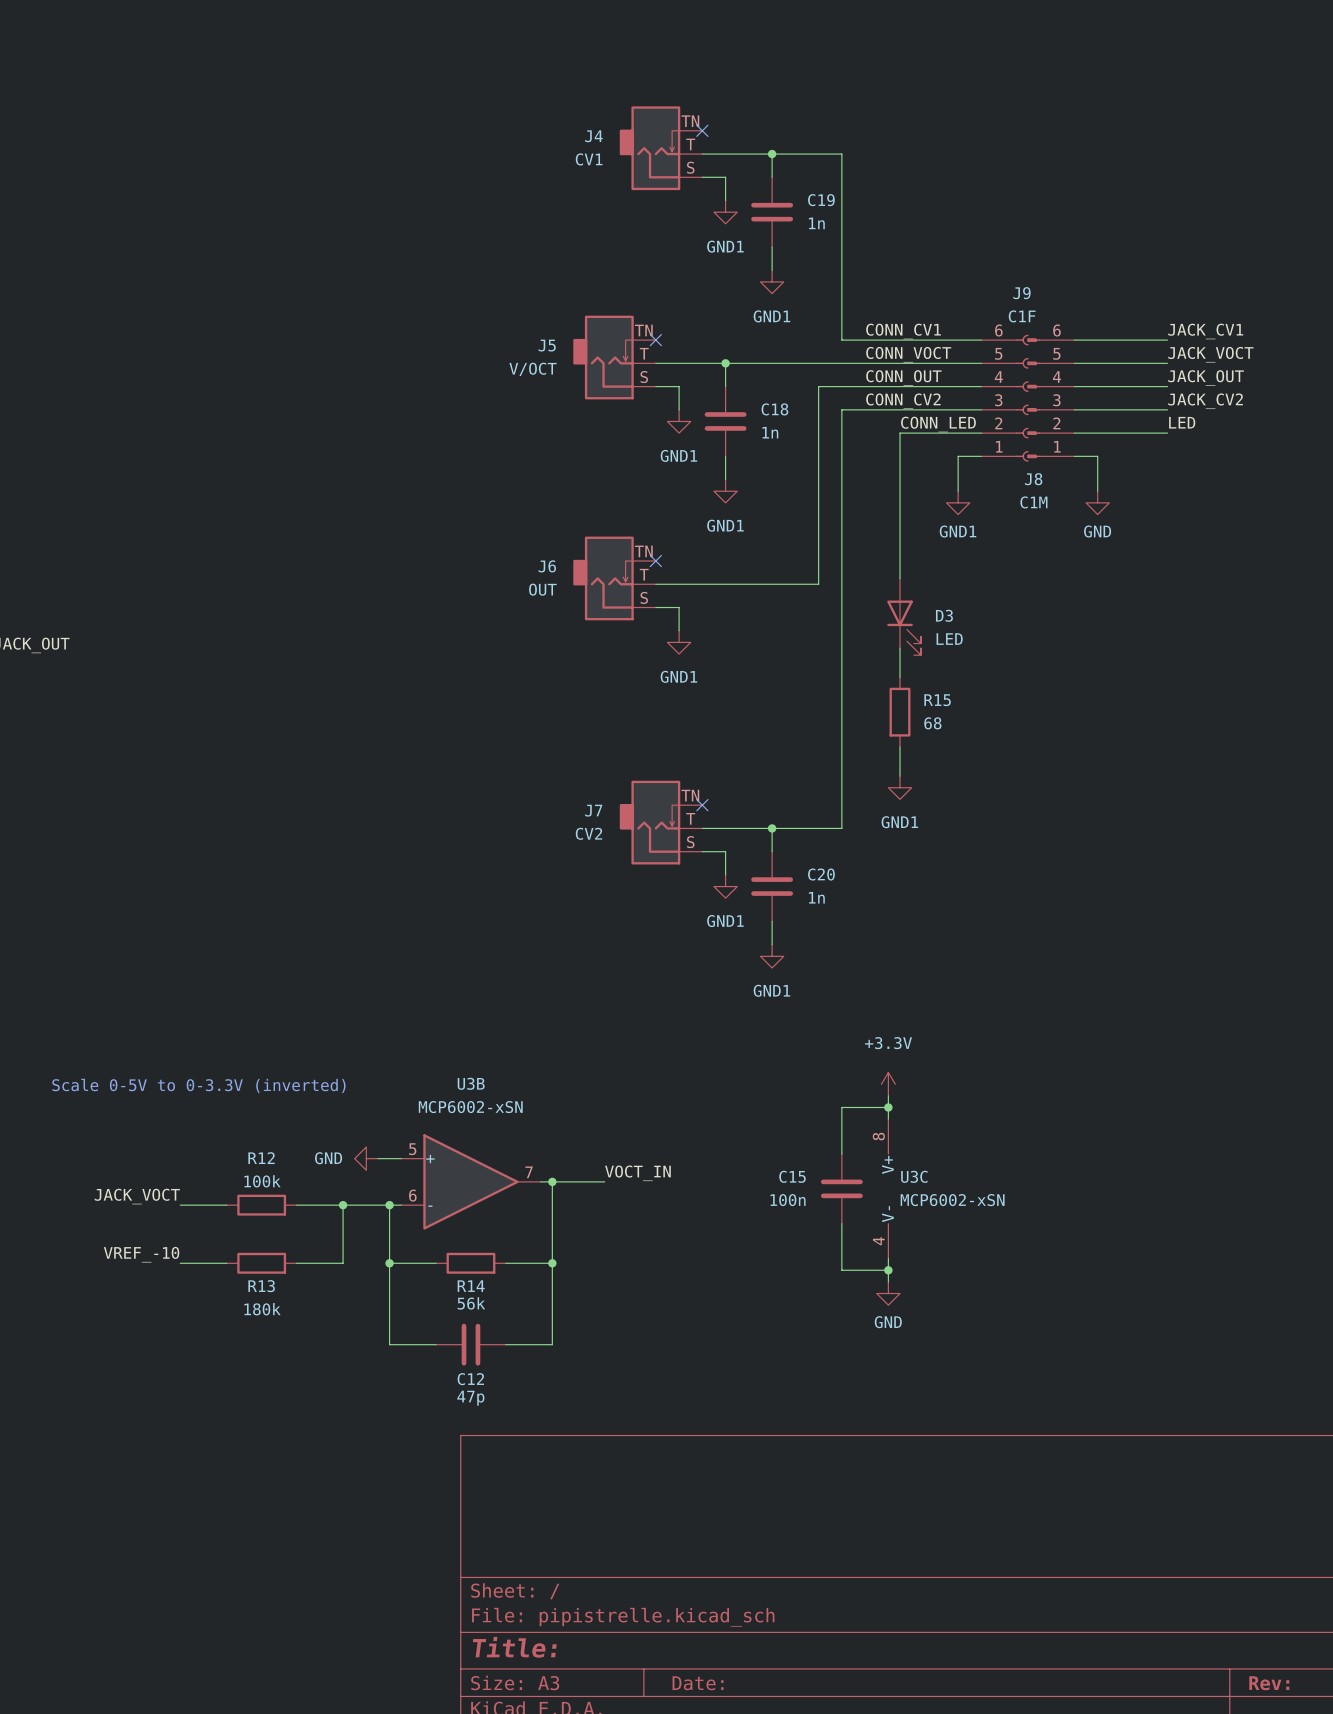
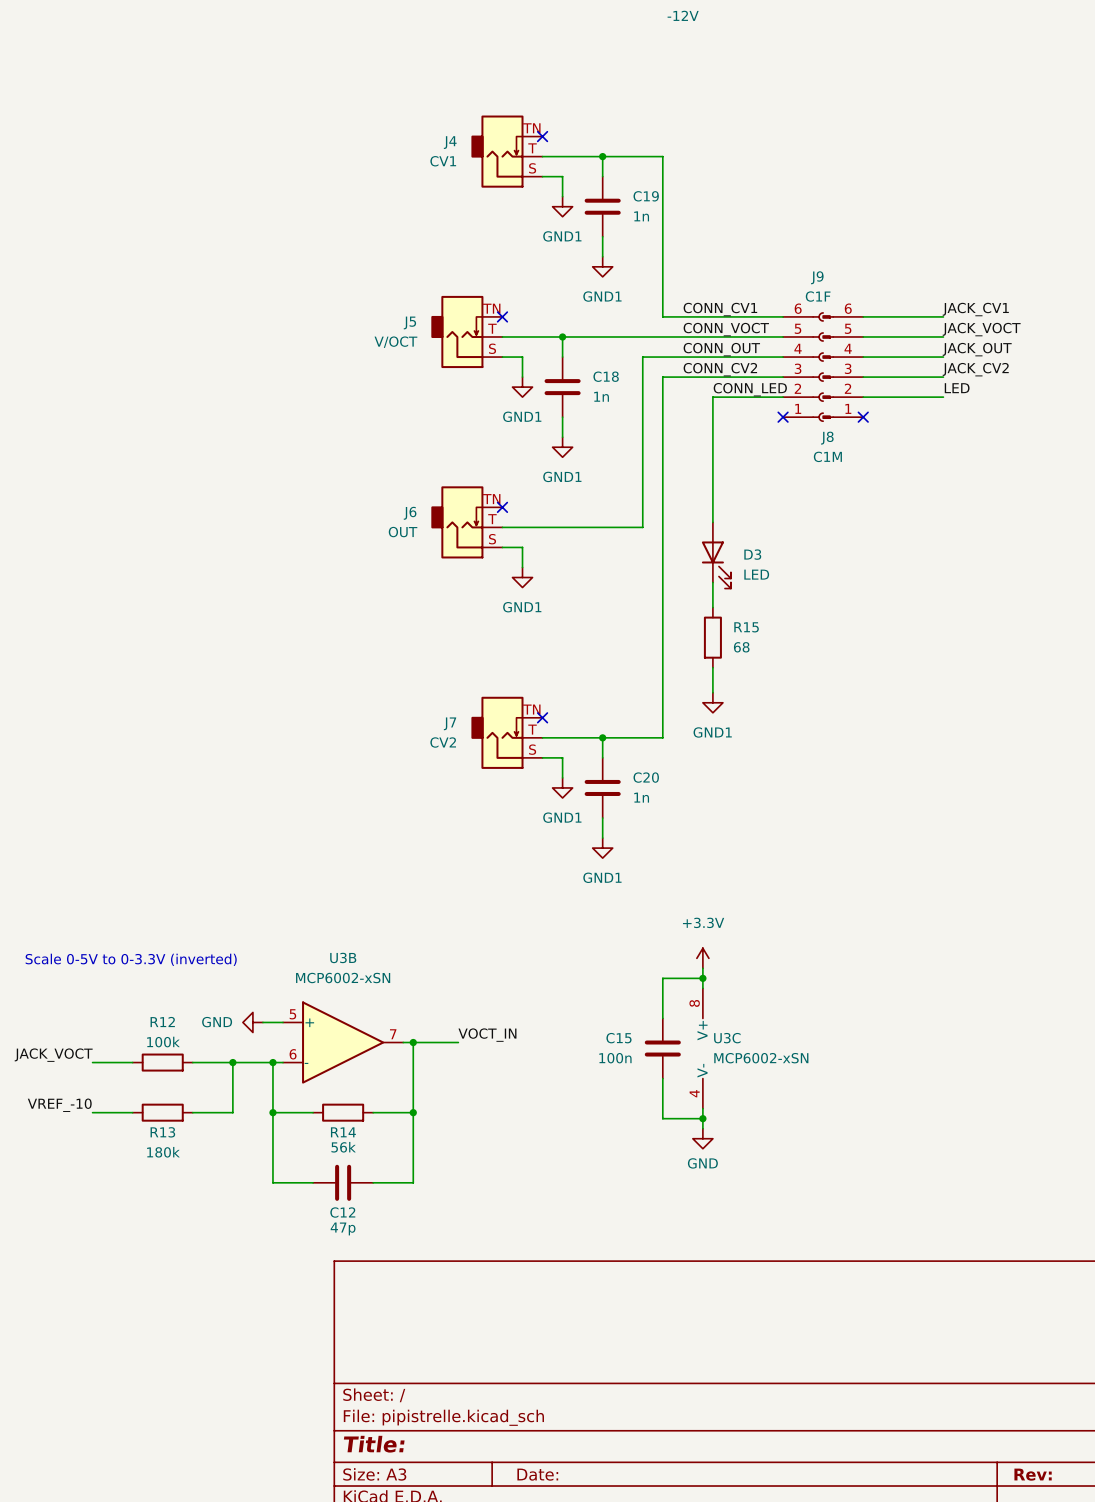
wire: (981, 456) (958, 456) (958, 491) -> none
no-connect mark: none -> (783, 417)
wire: (1074, 456) (1097, 456) (1097, 491) -> none
no-connect mark: none -> (863, 417)
power symbol: GND1 (958, 502) -> none
power symbol: GND (1097, 502) -> none

